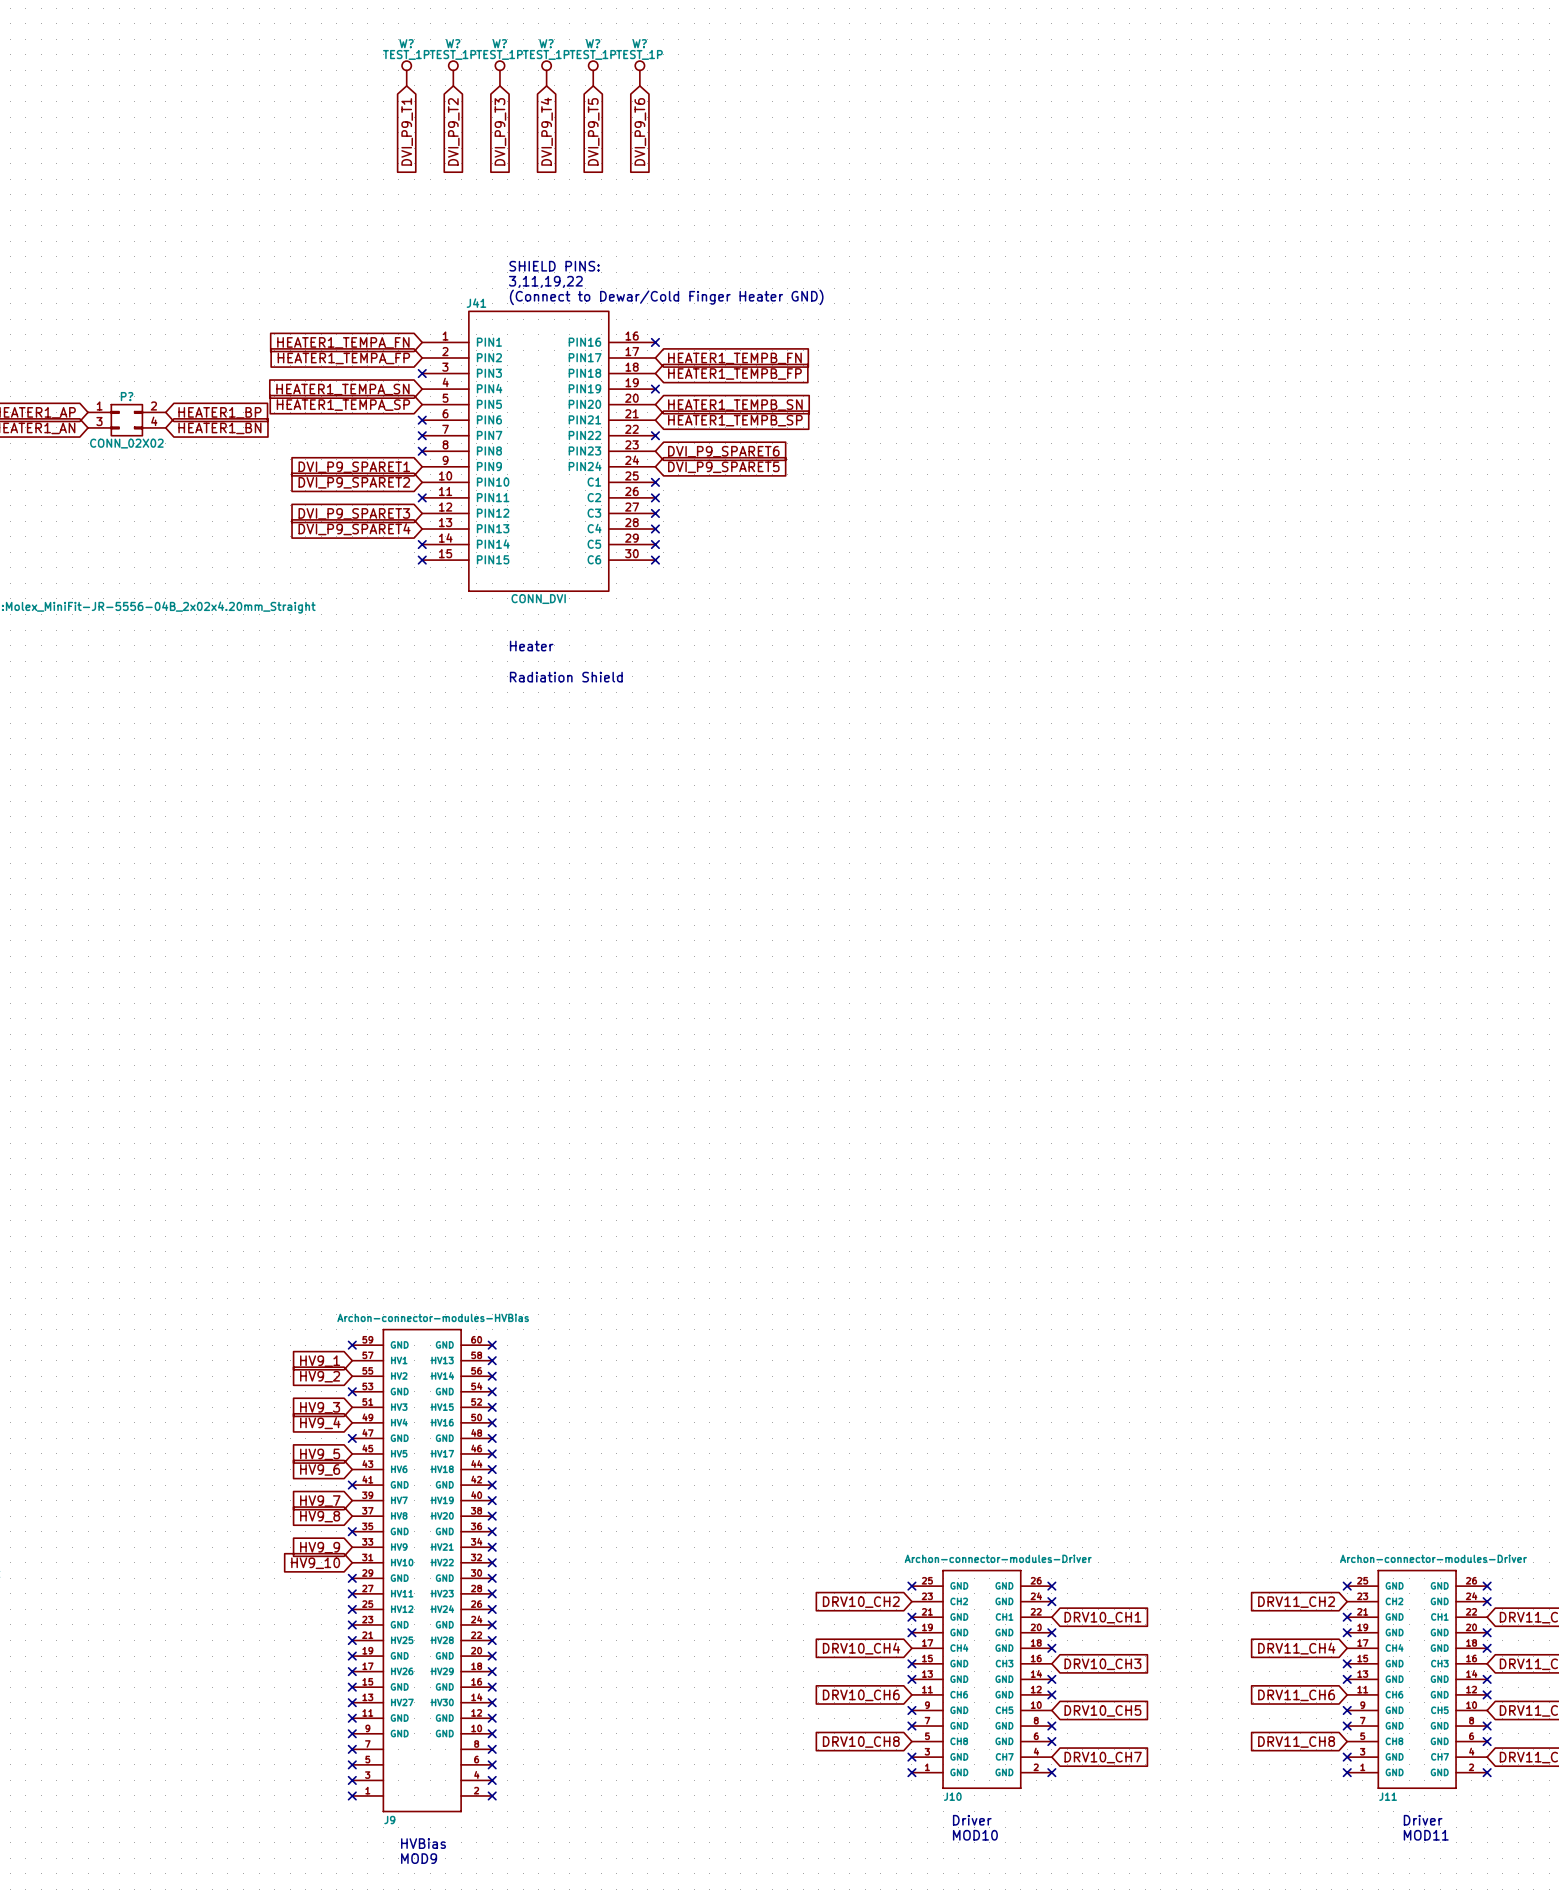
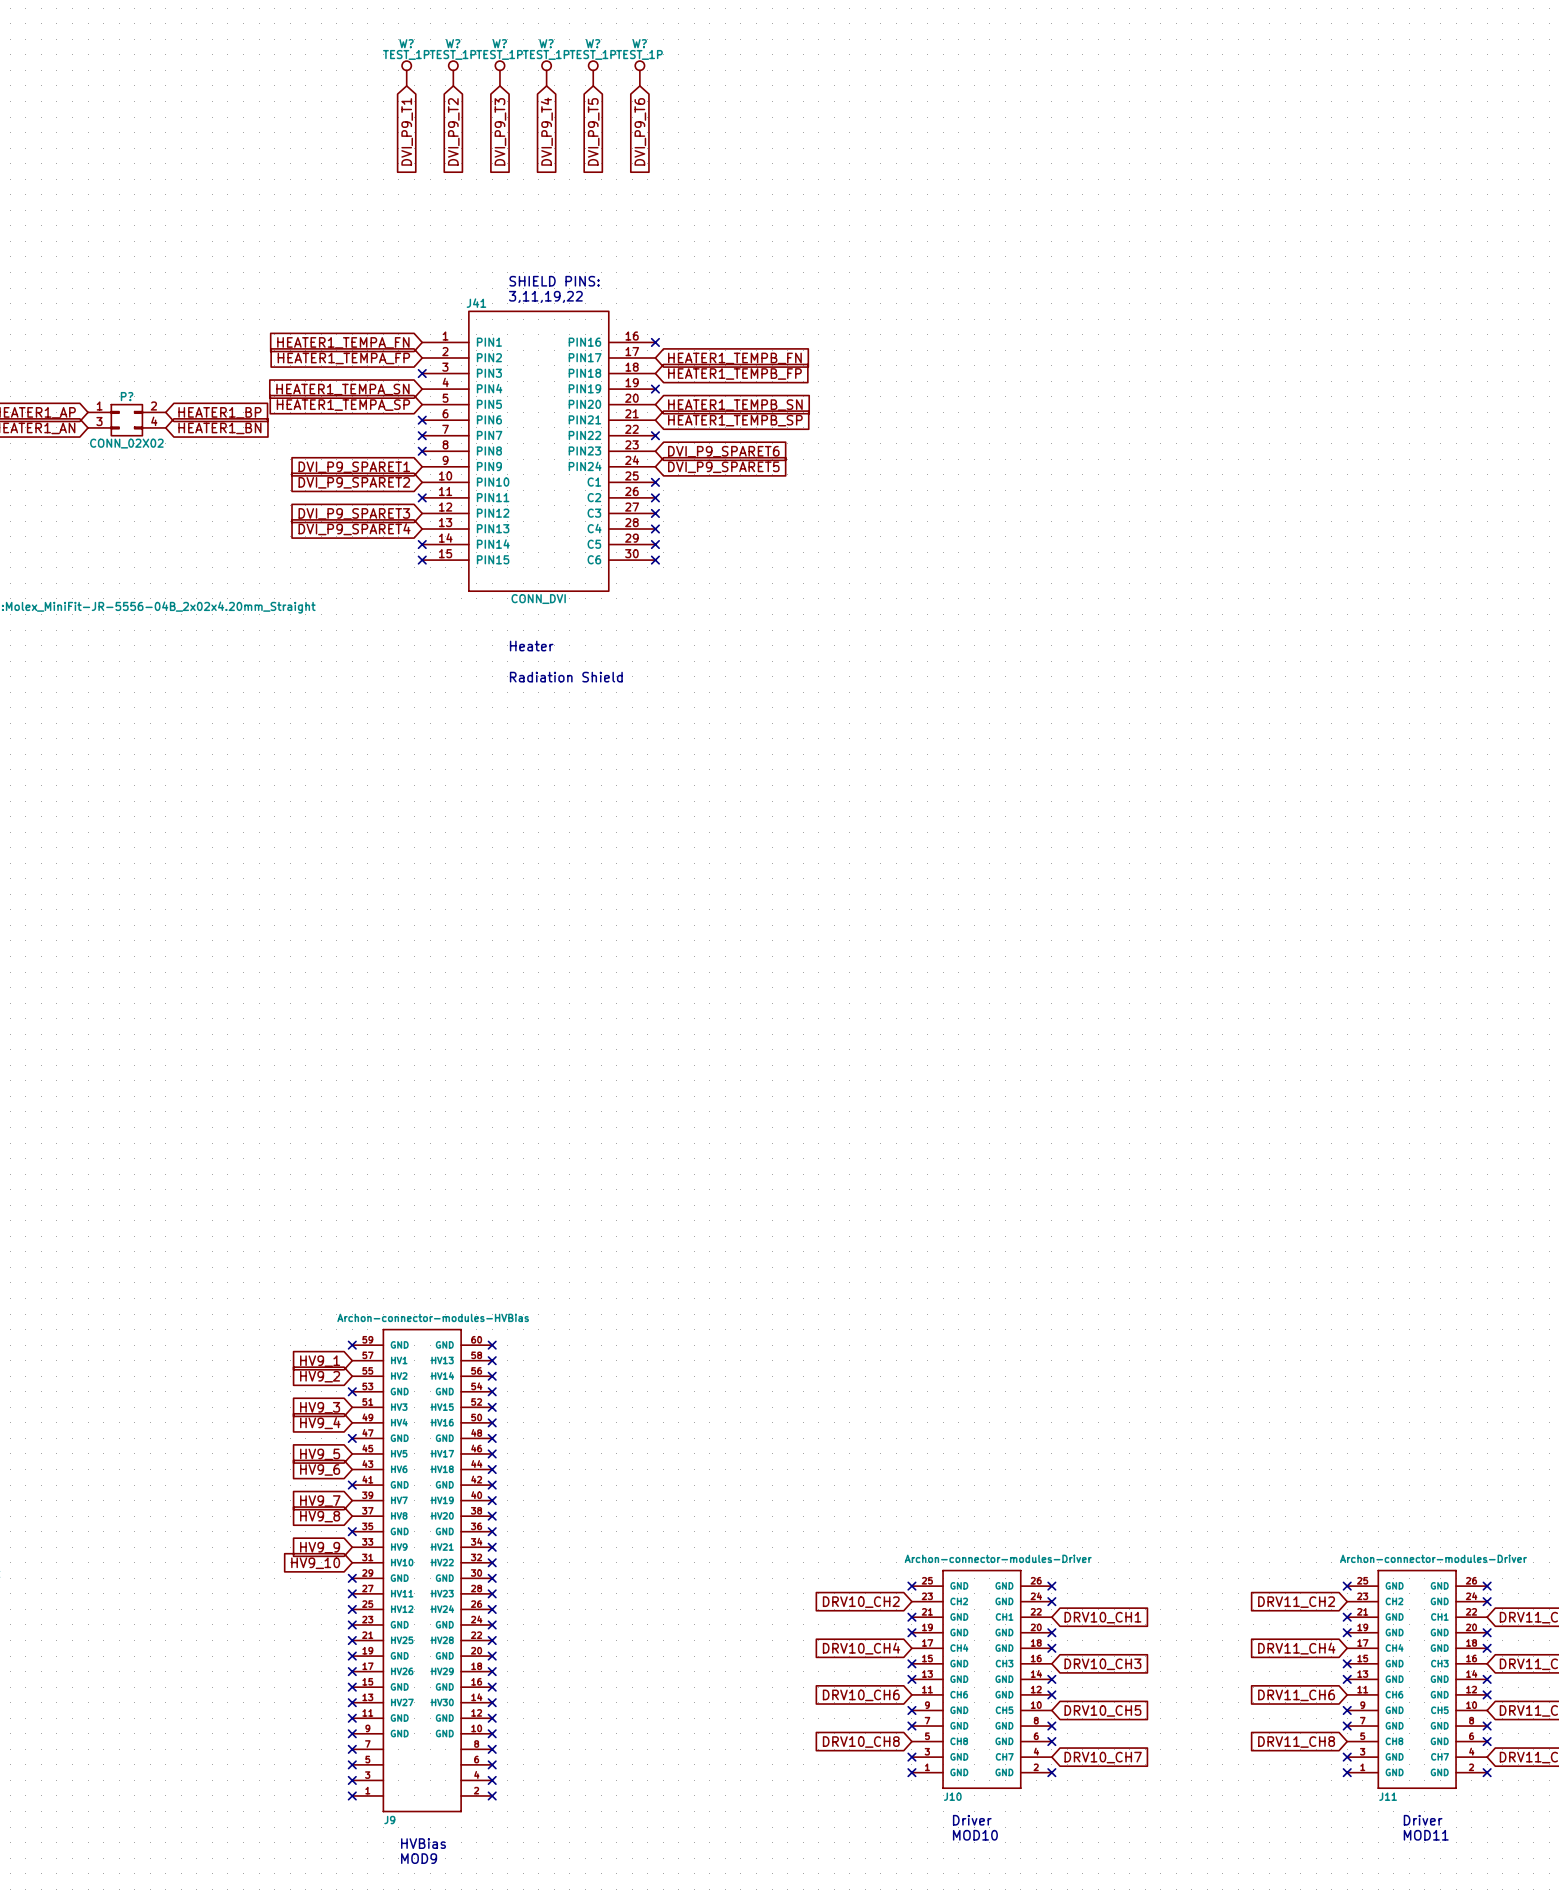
text: SHIELD PINS: (554, 266) -> none
text: 3,11,19,22 (545, 281) -> SHIELD PINS: (554, 281)
text: (Connect to Dewar/Cold Finger Heater GND) (666, 297) -> 3,11,19,22 (545, 296)

